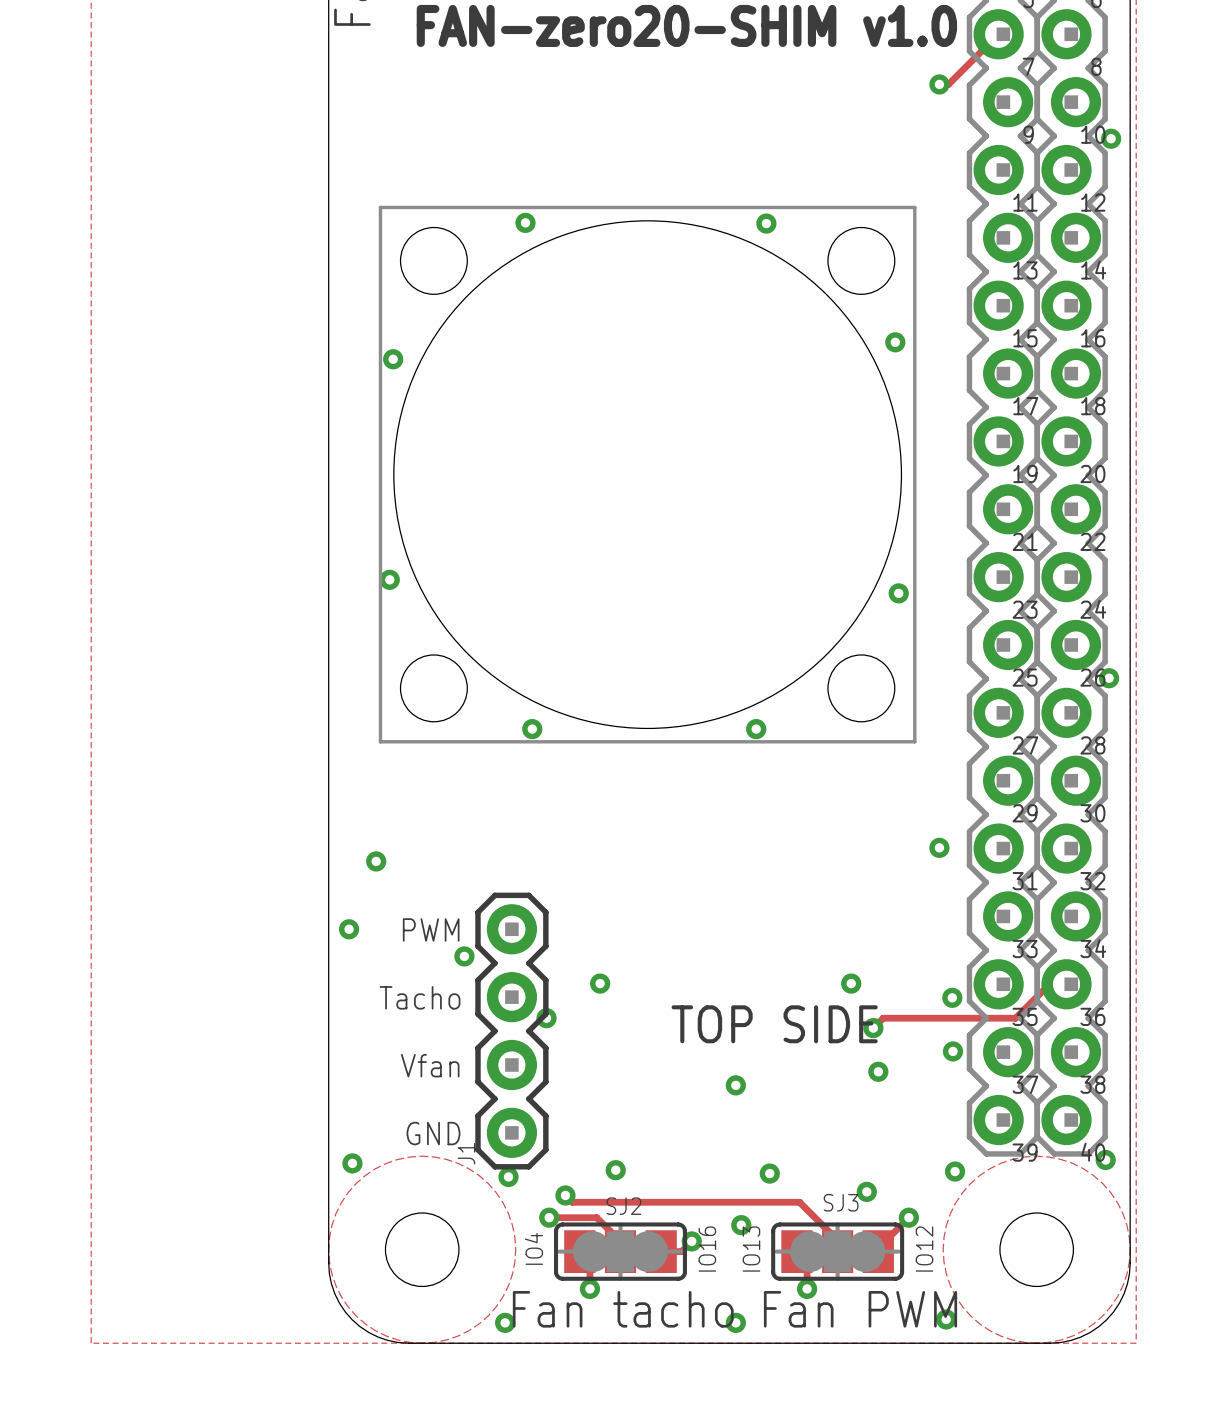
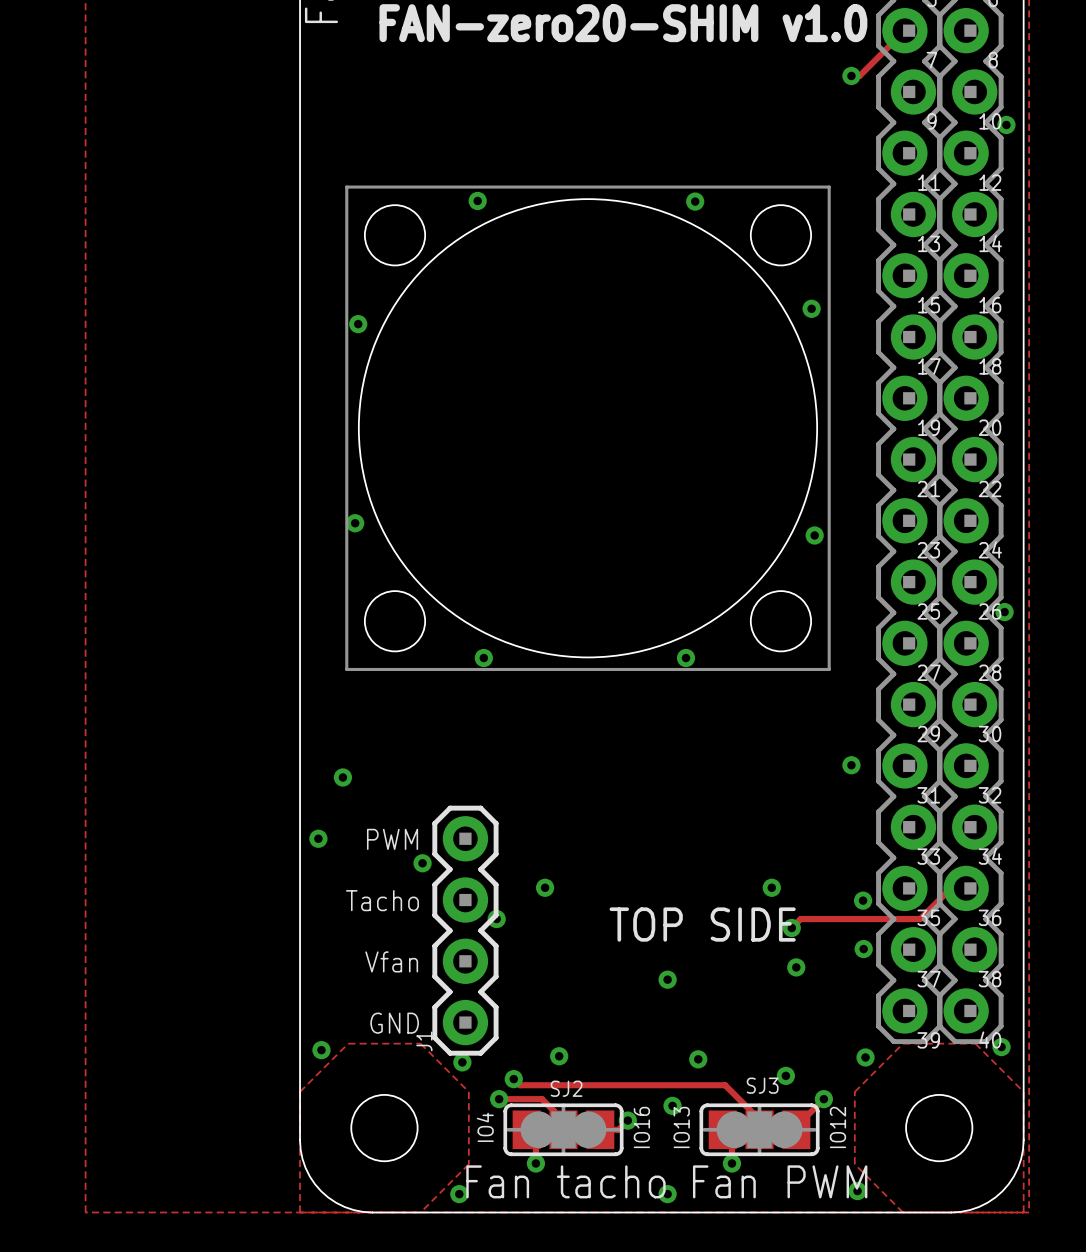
zone outline: (422, 1156) (398, 1159) (386, 1163) (365, 1175) (356, 1183) (348, 1192) (335, 1213) (329, 1237) (328, 1249) (329, 1261) (335, 1285) (348, 1306) (356, 1315) (365, 1323) (386, 1336) (410, 1342) (422, 1343) (446, 1340) (457, 1336) (468, 1330) (488, 1315) (496, 1306) (508, 1285) (512, 1273) (515, 1249) (514, 1237) (508, 1213) (496, 1192) (488, 1183) (468, 1168) (457, 1163) (446, 1159) (422, 1156) -> none
zone outline: (1036, 1156) (1024, 1157) (1000, 1163) (979, 1175) (970, 1183) (962, 1192) (950, 1213) (943, 1237) (943, 1249) (943, 1261) (950, 1285) (955, 1296) (970, 1315) (979, 1323) (1000, 1336) (1024, 1342) (1036, 1343) (1048, 1342) (1072, 1336) (1093, 1323) (1102, 1315) (1110, 1306) (1123, 1285) (1129, 1261) (1130, 1249) (1129, 1237) (1123, 1213) (1117, 1202) (1102, 1183) (1093, 1175) (1072, 1163) (1060, 1159) (1036, 1156) -> none
zone outline: none -> (300, 1212) (300, 1091) (348, 1043) (420, 1043) (468, 1091) (468, 1164) (420, 1212)
zone outline: none -> (903, 1212) (854, 1164) (854, 1091) (903, 1043) (975, 1043) (1023, 1091) (1023, 1212)

